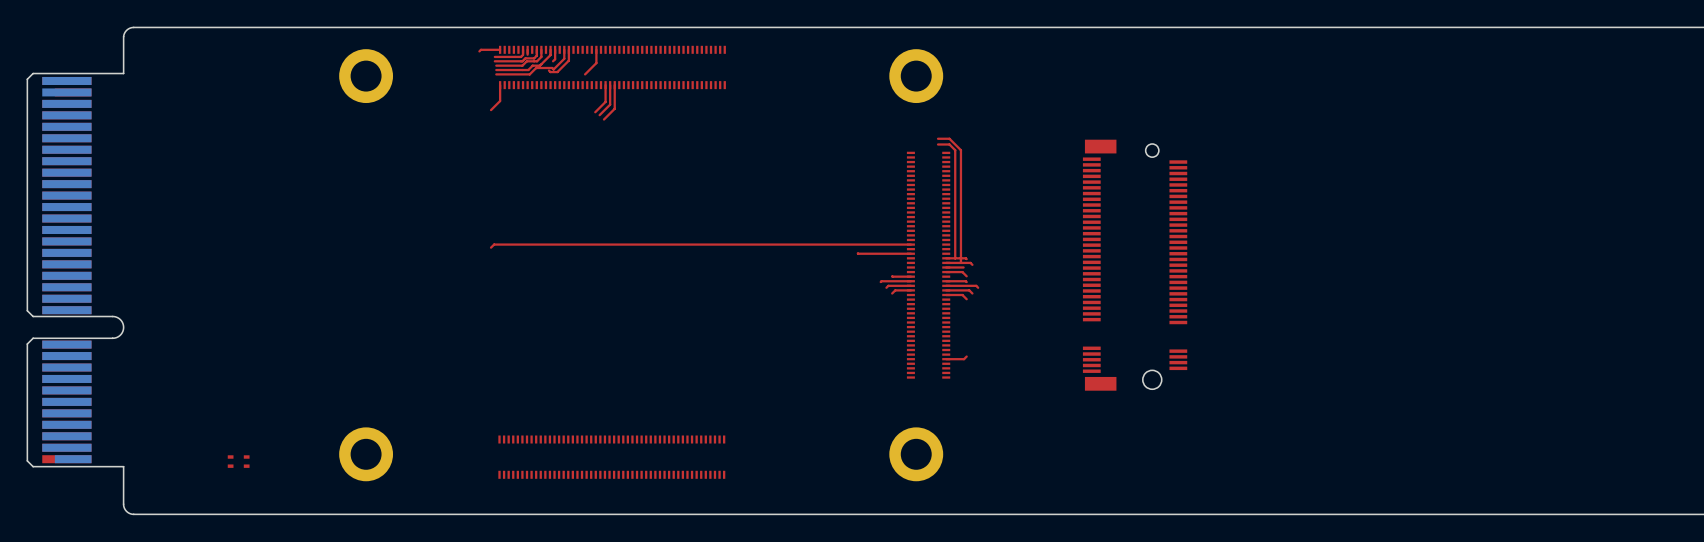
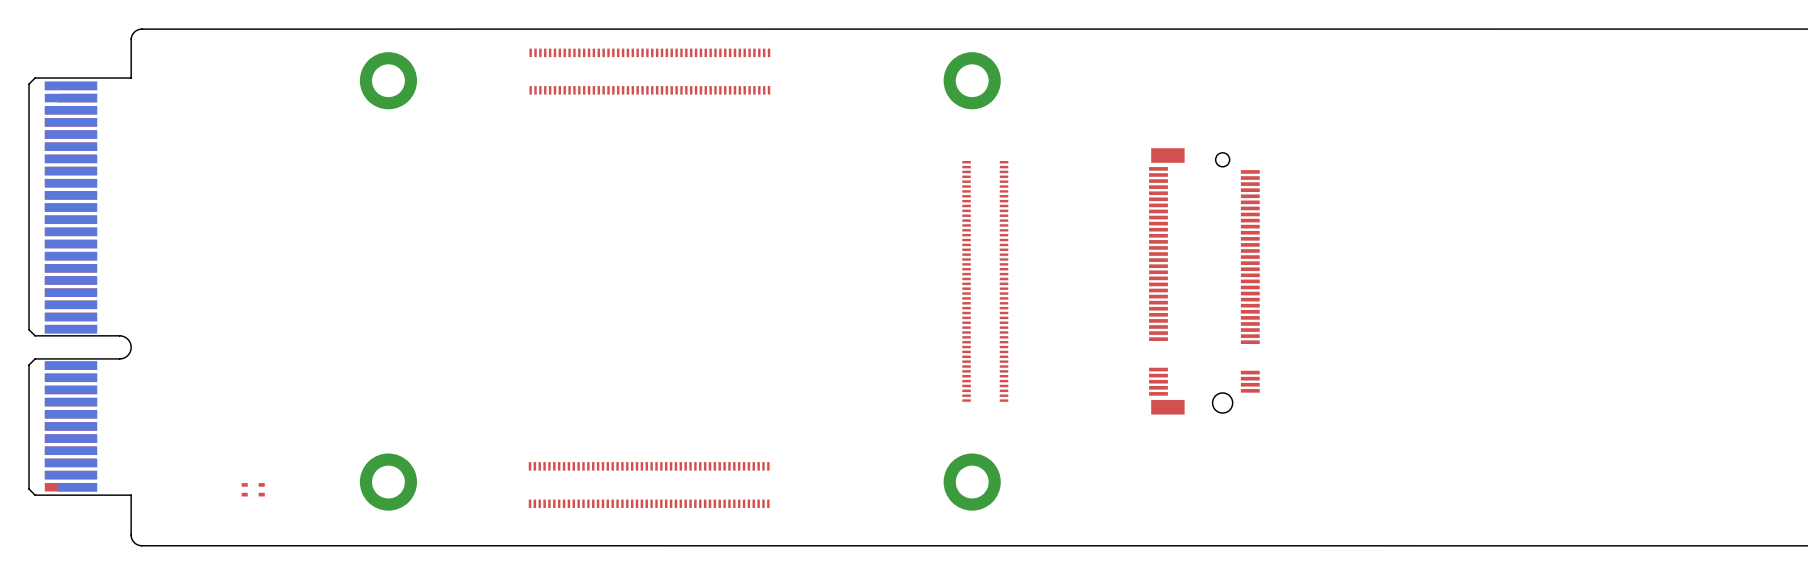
top track: (500, 49) (479, 51) -> none
top track: (523, 49) (521, 56) (494, 56) -> none
top track: (527, 49) (527, 54) -> none
top track: (536, 49) (536, 55) (534, 58) (525, 58) (522, 61) (494, 61) -> none
top track: (541, 49) (541, 56) (537, 61) (526, 61) (522, 65) (496, 65) -> none
top track: (550, 49) (550, 55) (539, 65) (532, 65) (528, 70) (496, 70) -> none
top track: (555, 49) (555, 59) (553, 61) -> none
top track: (564, 49) (564, 58) (553, 69) (536, 67) (529, 74) (496, 74) -> none
top track: (568, 49) (568, 60) (557, 72) (548, 70) -> none
top track: (596, 49) (596, 63) (585, 74) -> none
top track: (500, 85) (500, 101) (491, 110) -> none
top track: (605, 85) (605, 101) (595, 112) -> none
top track: (610, 85) (610, 104) (599, 115) -> none
top track: (614, 85) (614, 108) (604, 119) -> none
top track: (938, 138) (949, 138) (960, 150) (960, 262) -> none
top track: (938, 144) (949, 144) (955, 150) (955, 258) -> none
top track: (910, 244) (494, 244) (491, 247) -> none
top track: (857, 253) (910, 253) -> none
top track: (946, 258) (966, 259) -> none
top track: (946, 262) (970, 262) (972, 264) -> none
top track: (963, 267) (946, 267) -> none
top track: (946, 272) (962, 272) (966, 276) -> none
top track: (892, 276) (910, 276) -> none
top track: (910, 281) (880, 282) -> none
top track: (946, 281) (966, 282) -> none
top track: (910, 285) (888, 285) (886, 287) -> none
top track: (946, 285) (976, 285) (978, 287) -> none
top track: (910, 290) (895, 290) (892, 293) -> none
top track: (946, 290) (969, 290) (972, 293) -> none
top track: (946, 295) (962, 295) (966, 299) -> none
top track: (966, 356) (964, 359) (946, 359) -> none

